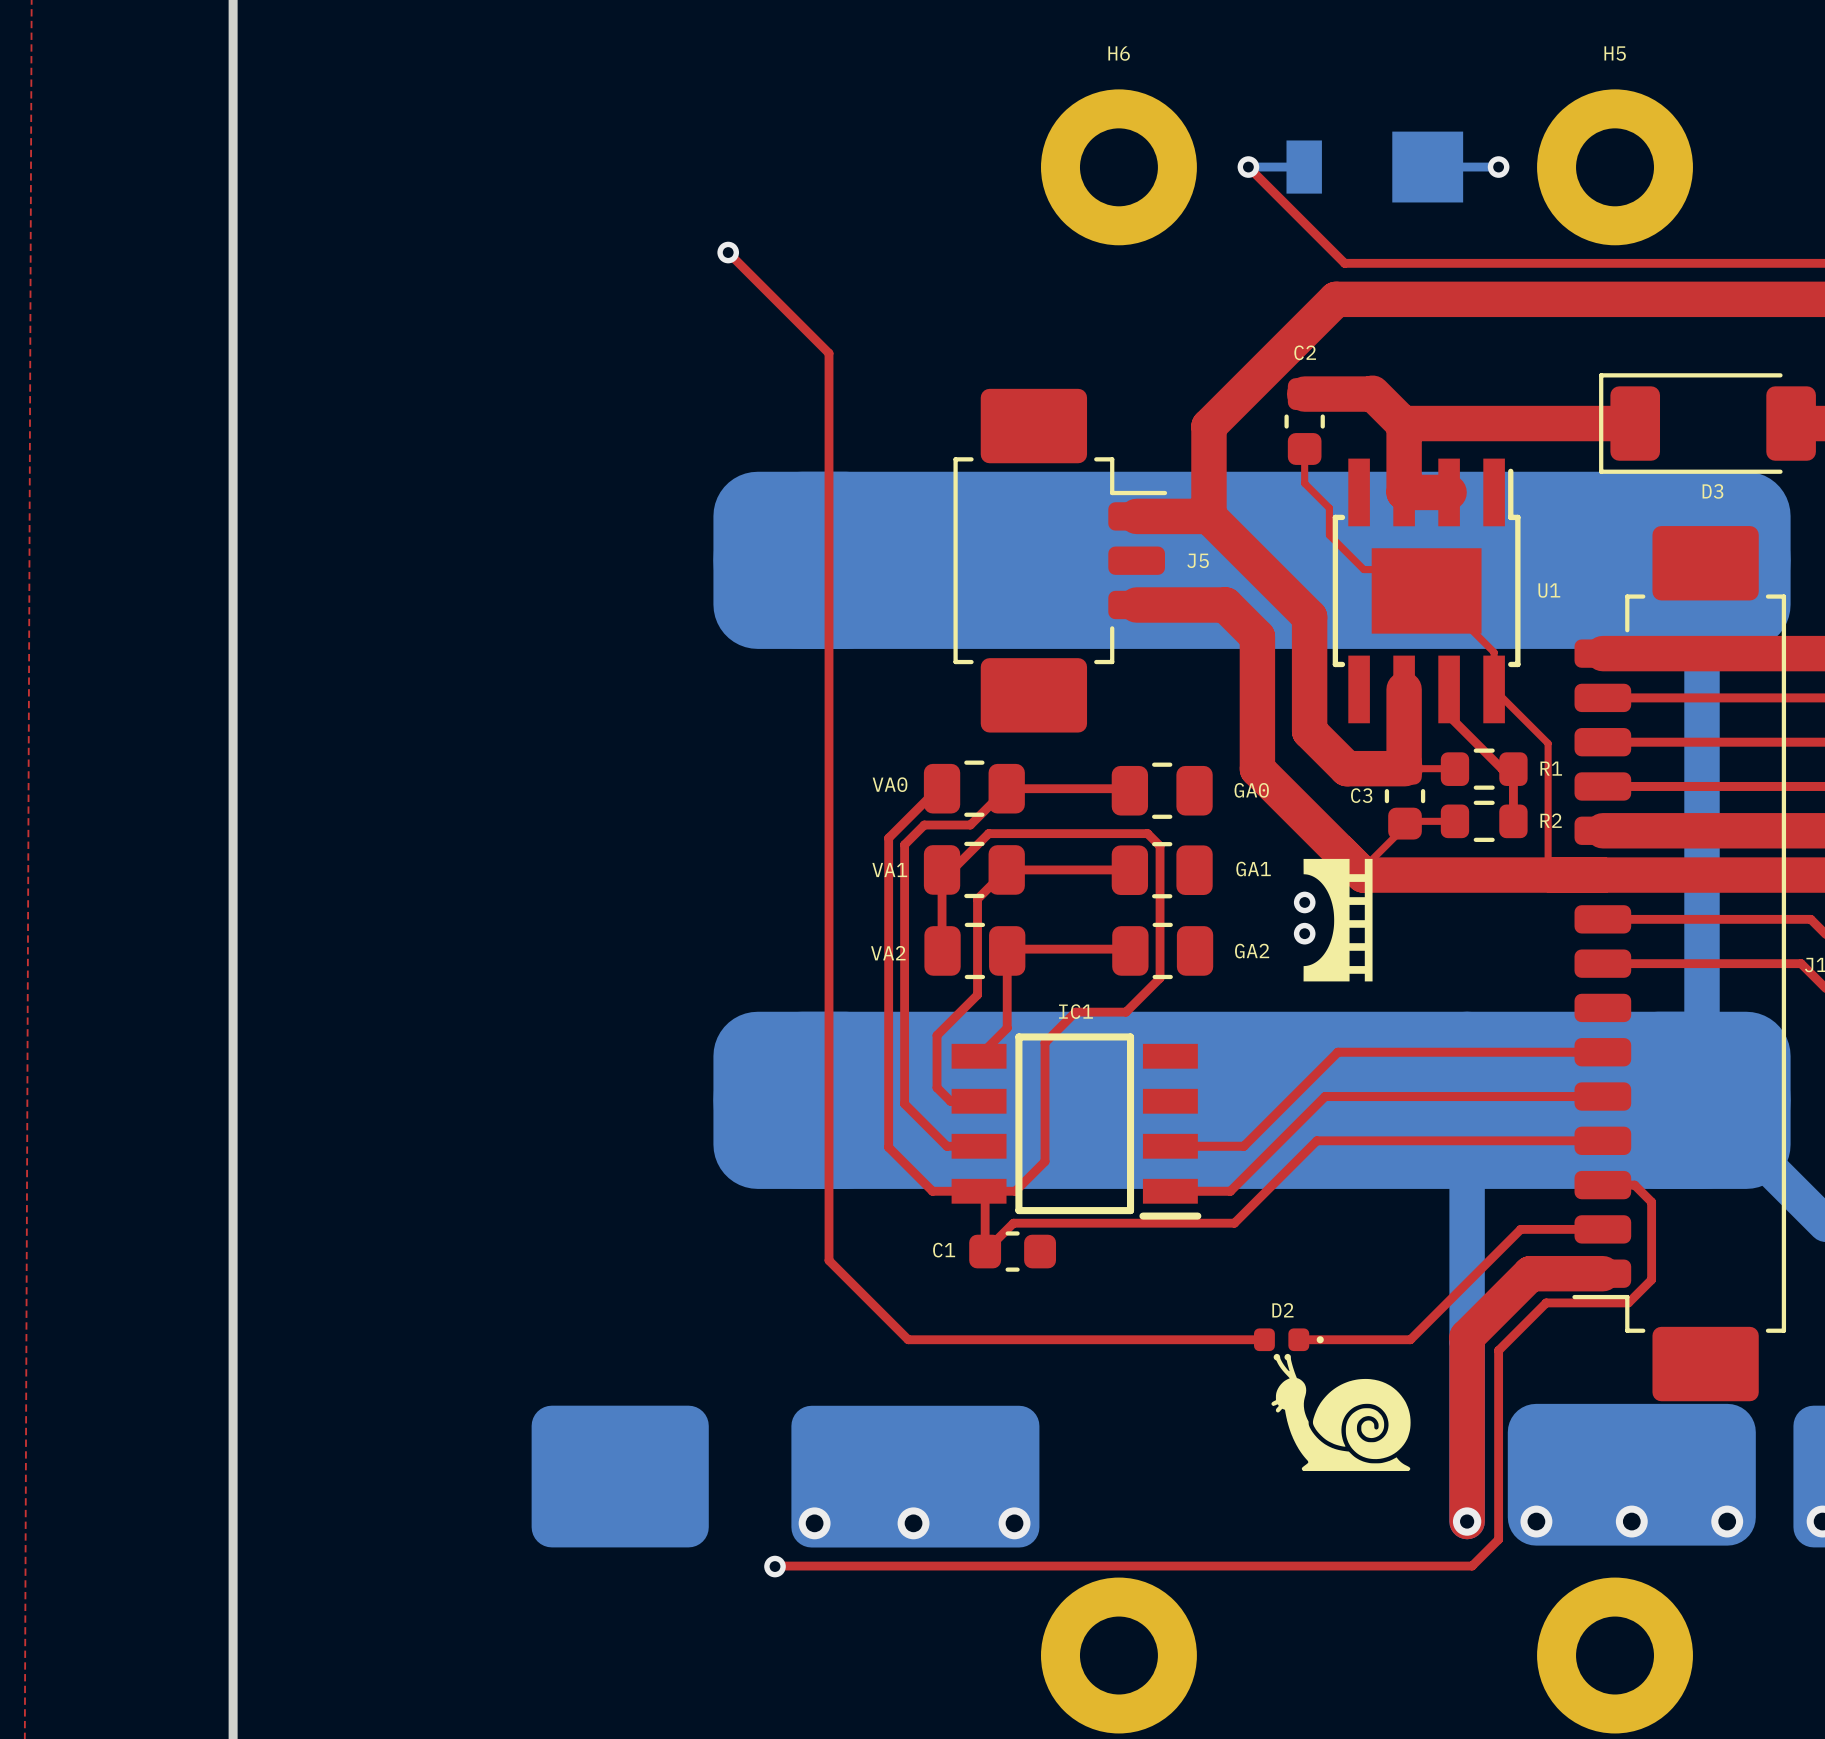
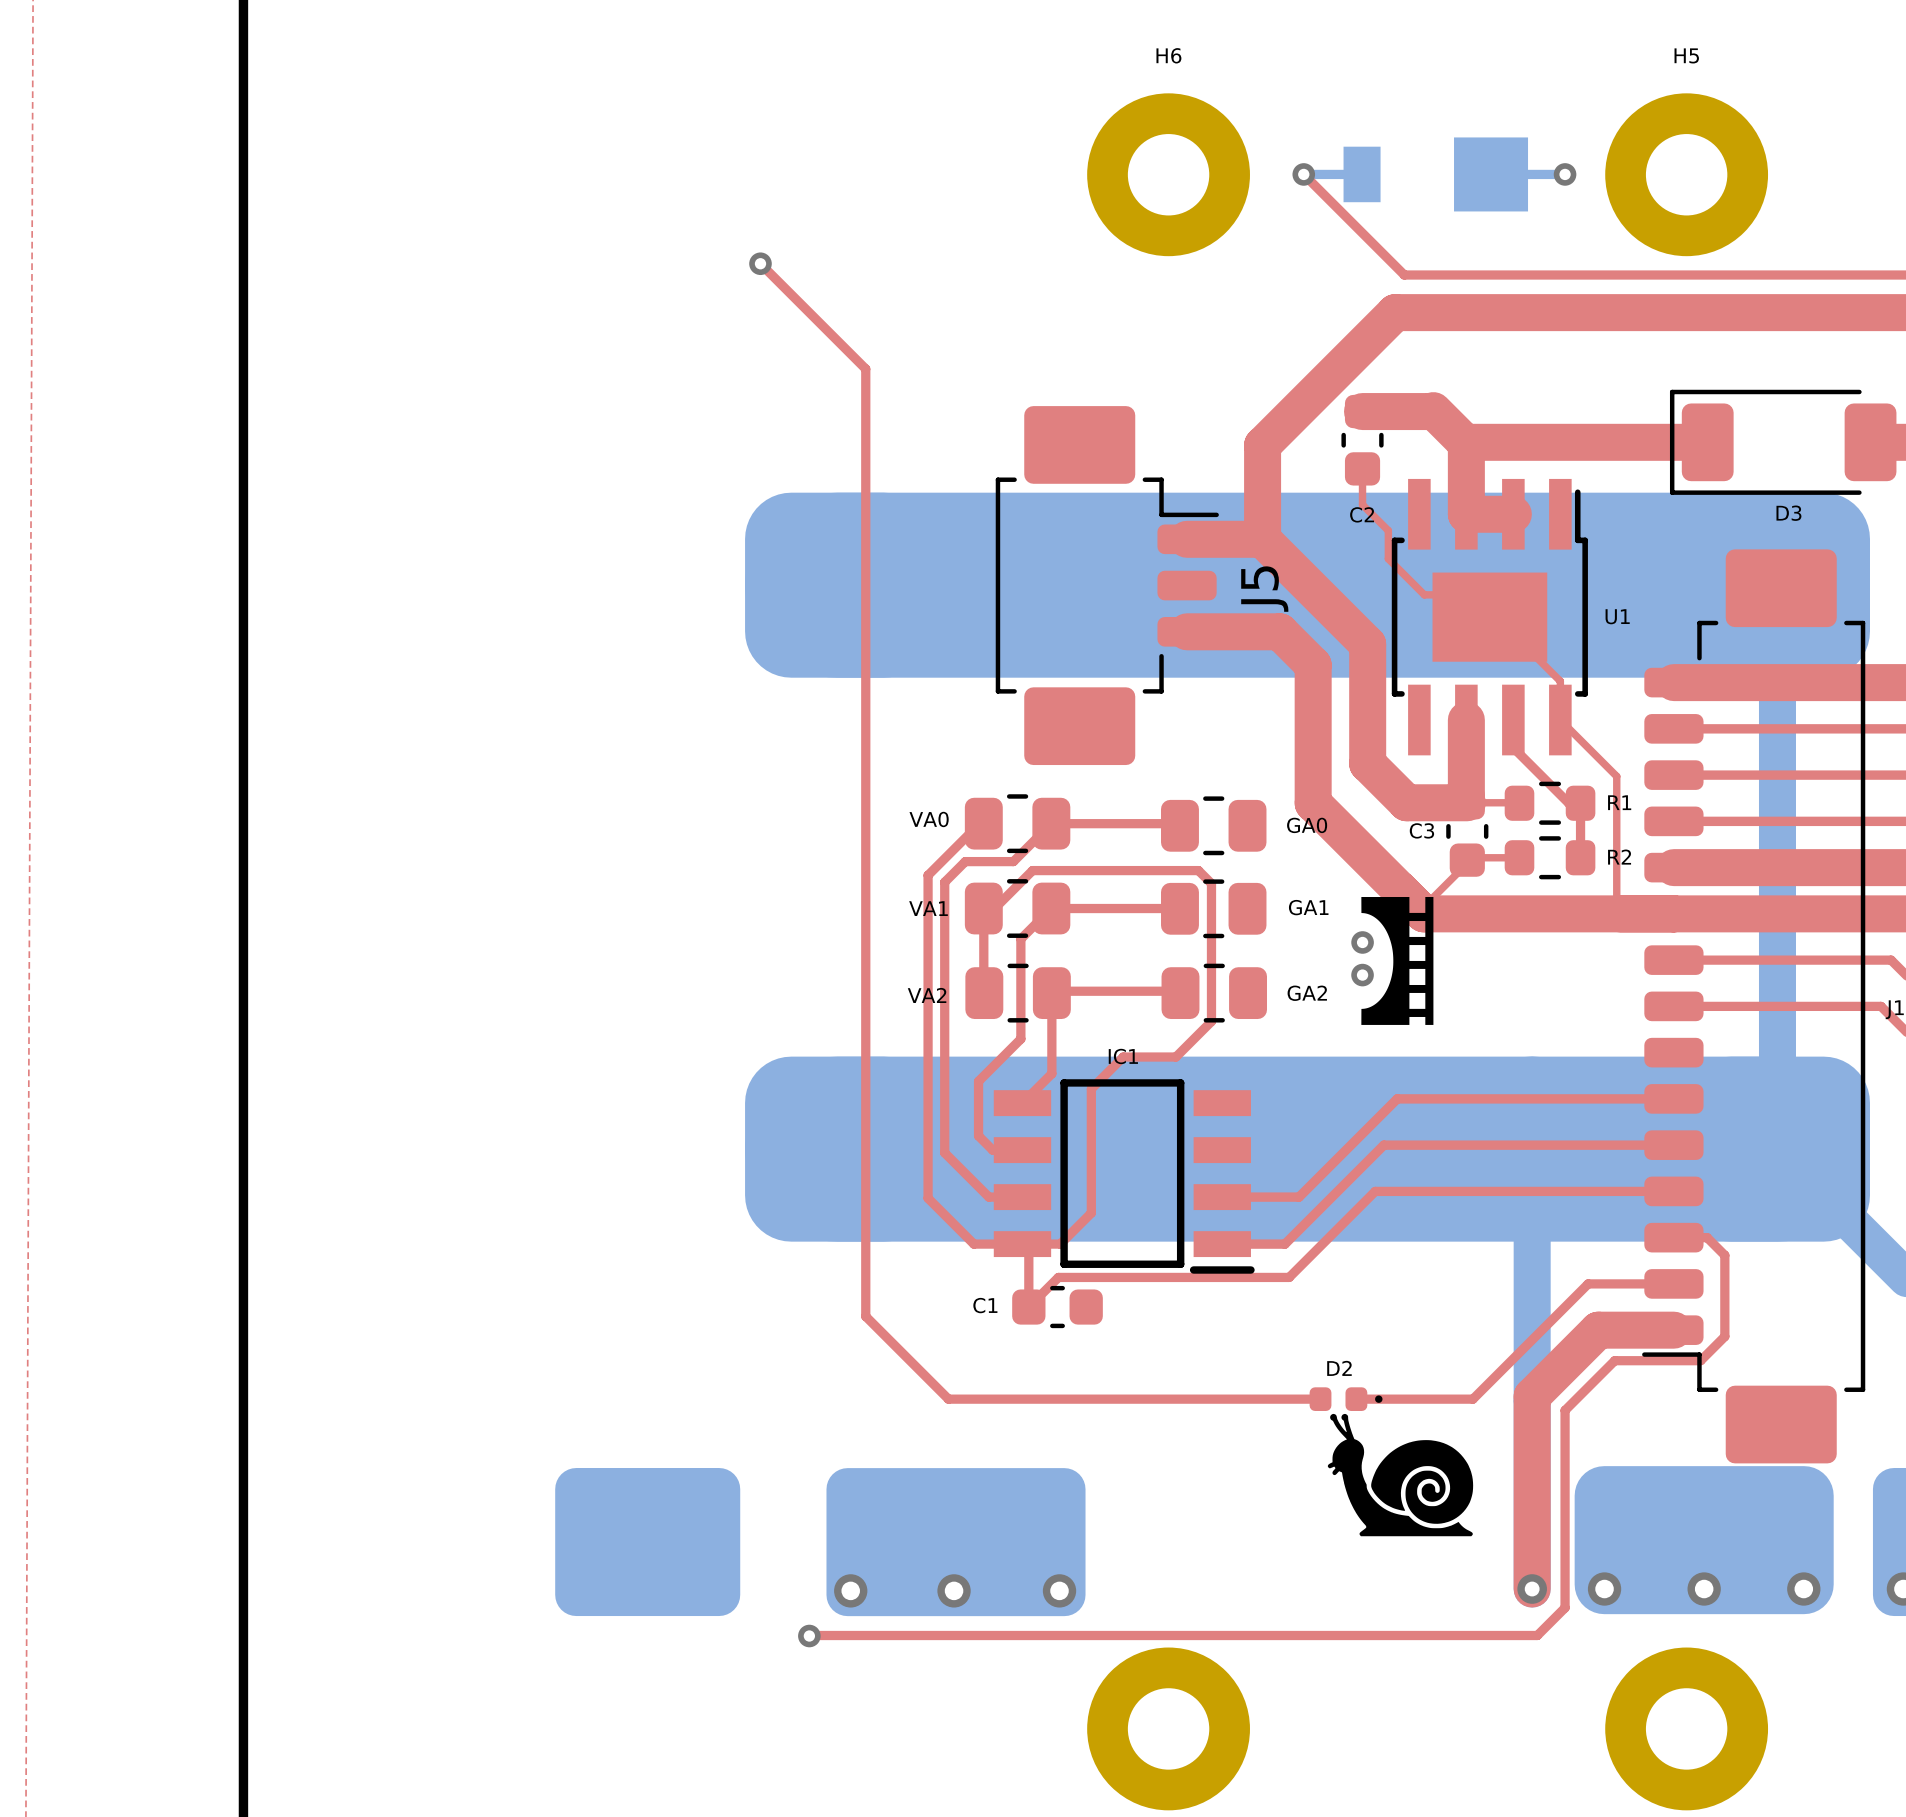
C2 name position: C2 (1305, 352) -> C2 (1362, 514)
text: J5 (1198, 560) -> none
J5 name: none -> J5 (1264, 589)

